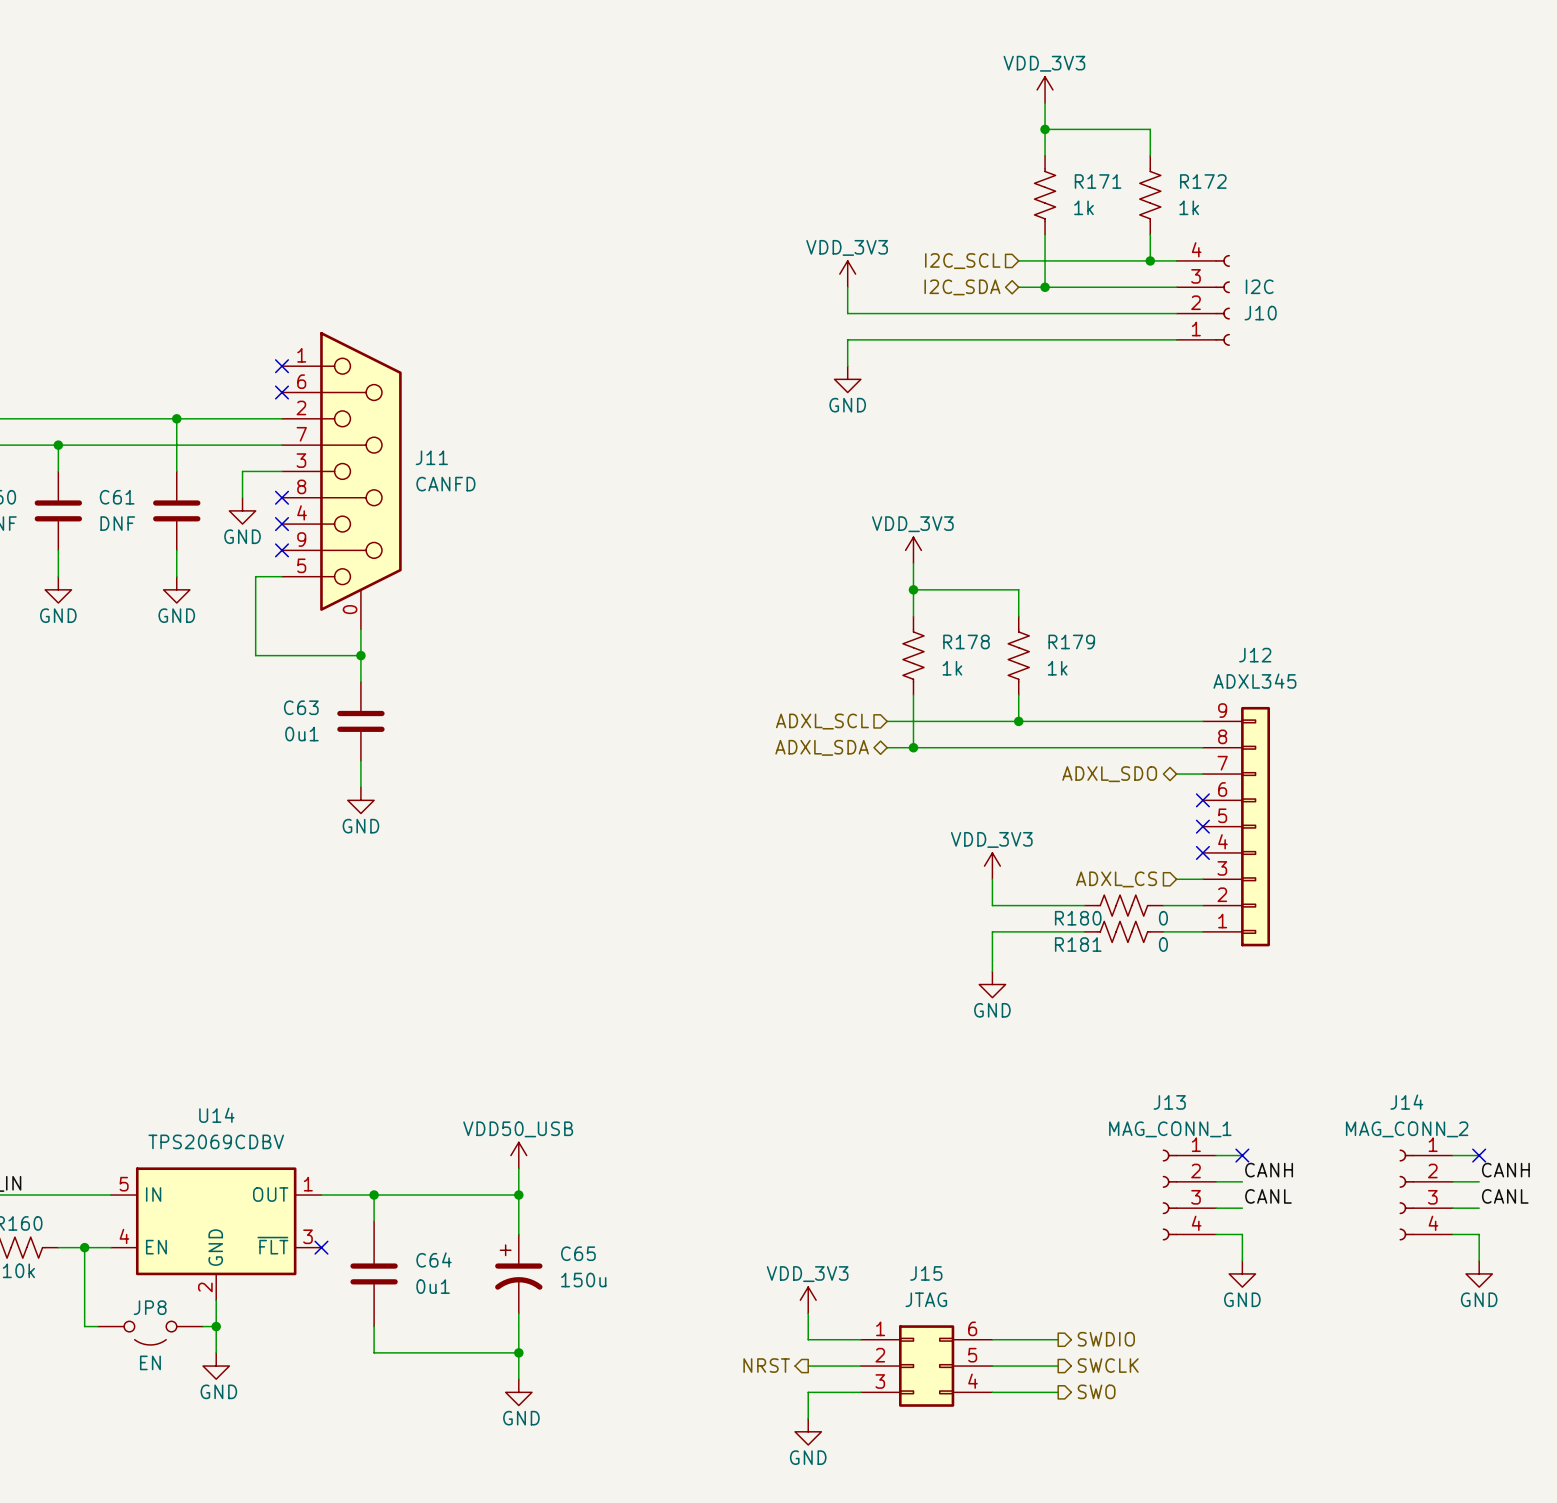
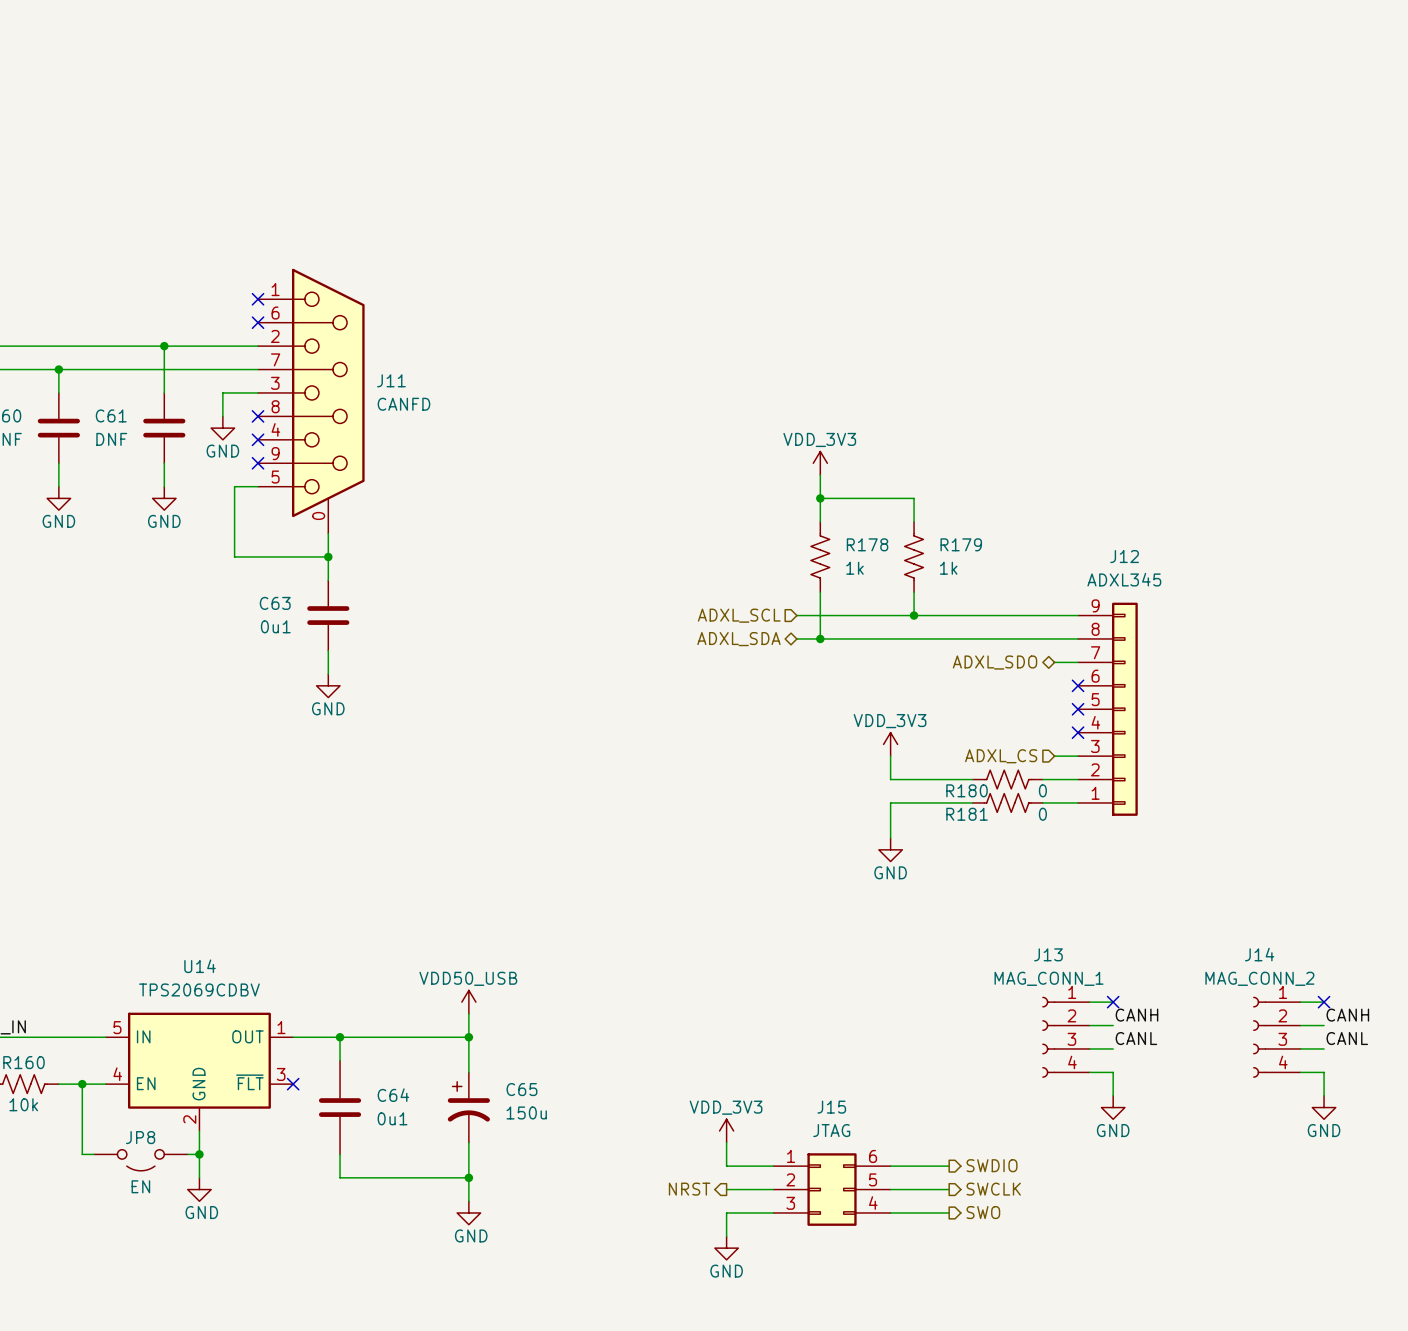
power symbol: VDD_3V3 (1045, 89) -> none
wire: (1045, 103) (1045, 155) -> none
wire: (1045, 129) (1150, 129) (1150, 155) -> none
junction: (1045, 129) -> none
R171: 1k (1045, 195) -> none
R172: 1k (1150, 195) -> none
wire: (1045, 234) (1045, 287) -> none
wire: (1150, 234) (1150, 260) -> none
wire: (1018, 260) (1176, 260) -> none
junction: (1150, 260) -> none
hierarchical label: I2C_SCL (962, 261) -> none
power symbol: VDD_3V3 (847, 274) -> none
wire: (847, 287) (847, 313) (1176, 313) -> none
hierarchical label: I2C_SDA (962, 287) -> none
wire: (1018, 287) (1176, 287) -> none
junction: (1045, 287) -> none
J10: I2C (1203, 300) -> none
wire: (1176, 339) (847, 339) (847, 366) -> none
power symbol: GND (847, 379) -> none

